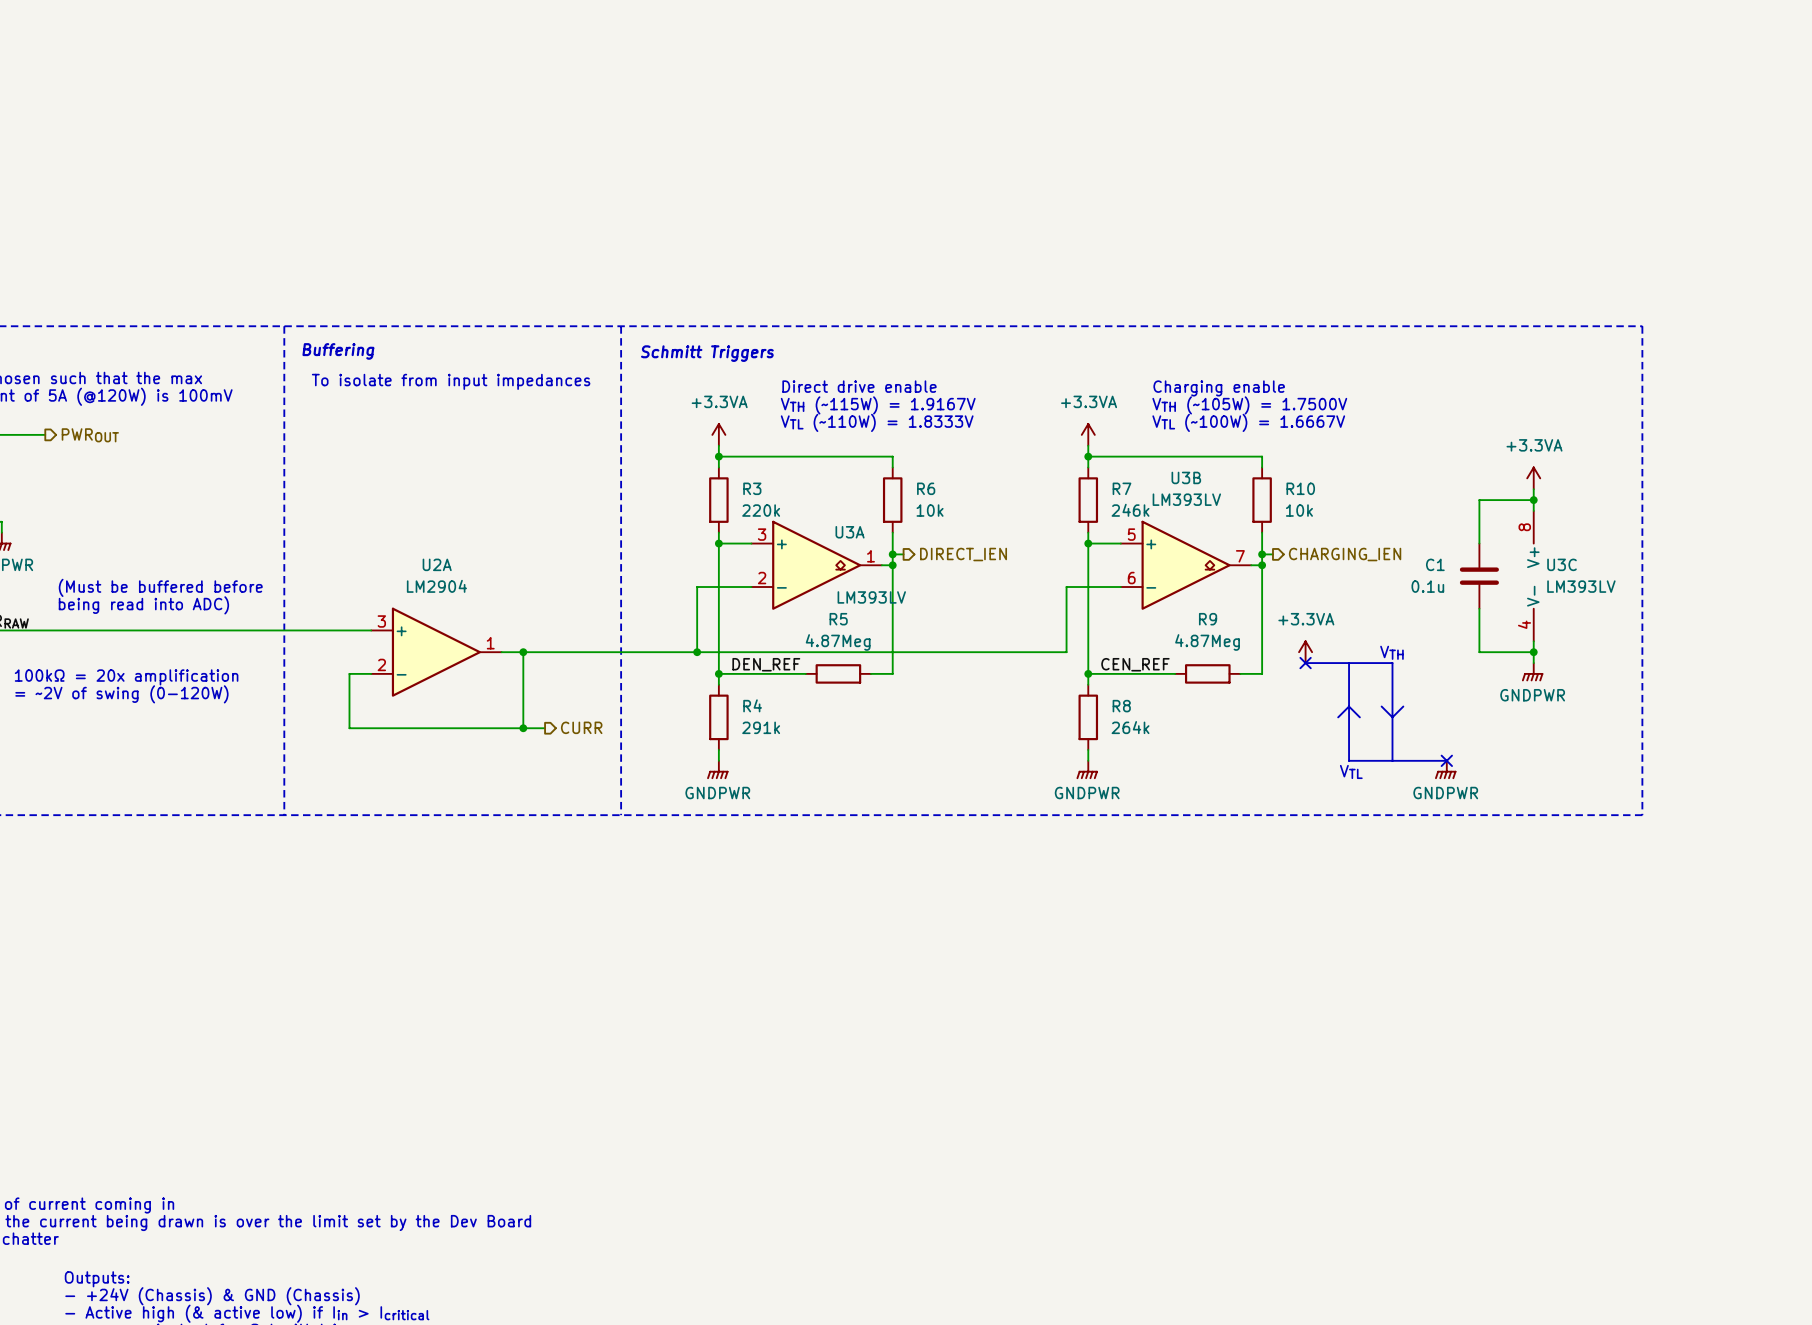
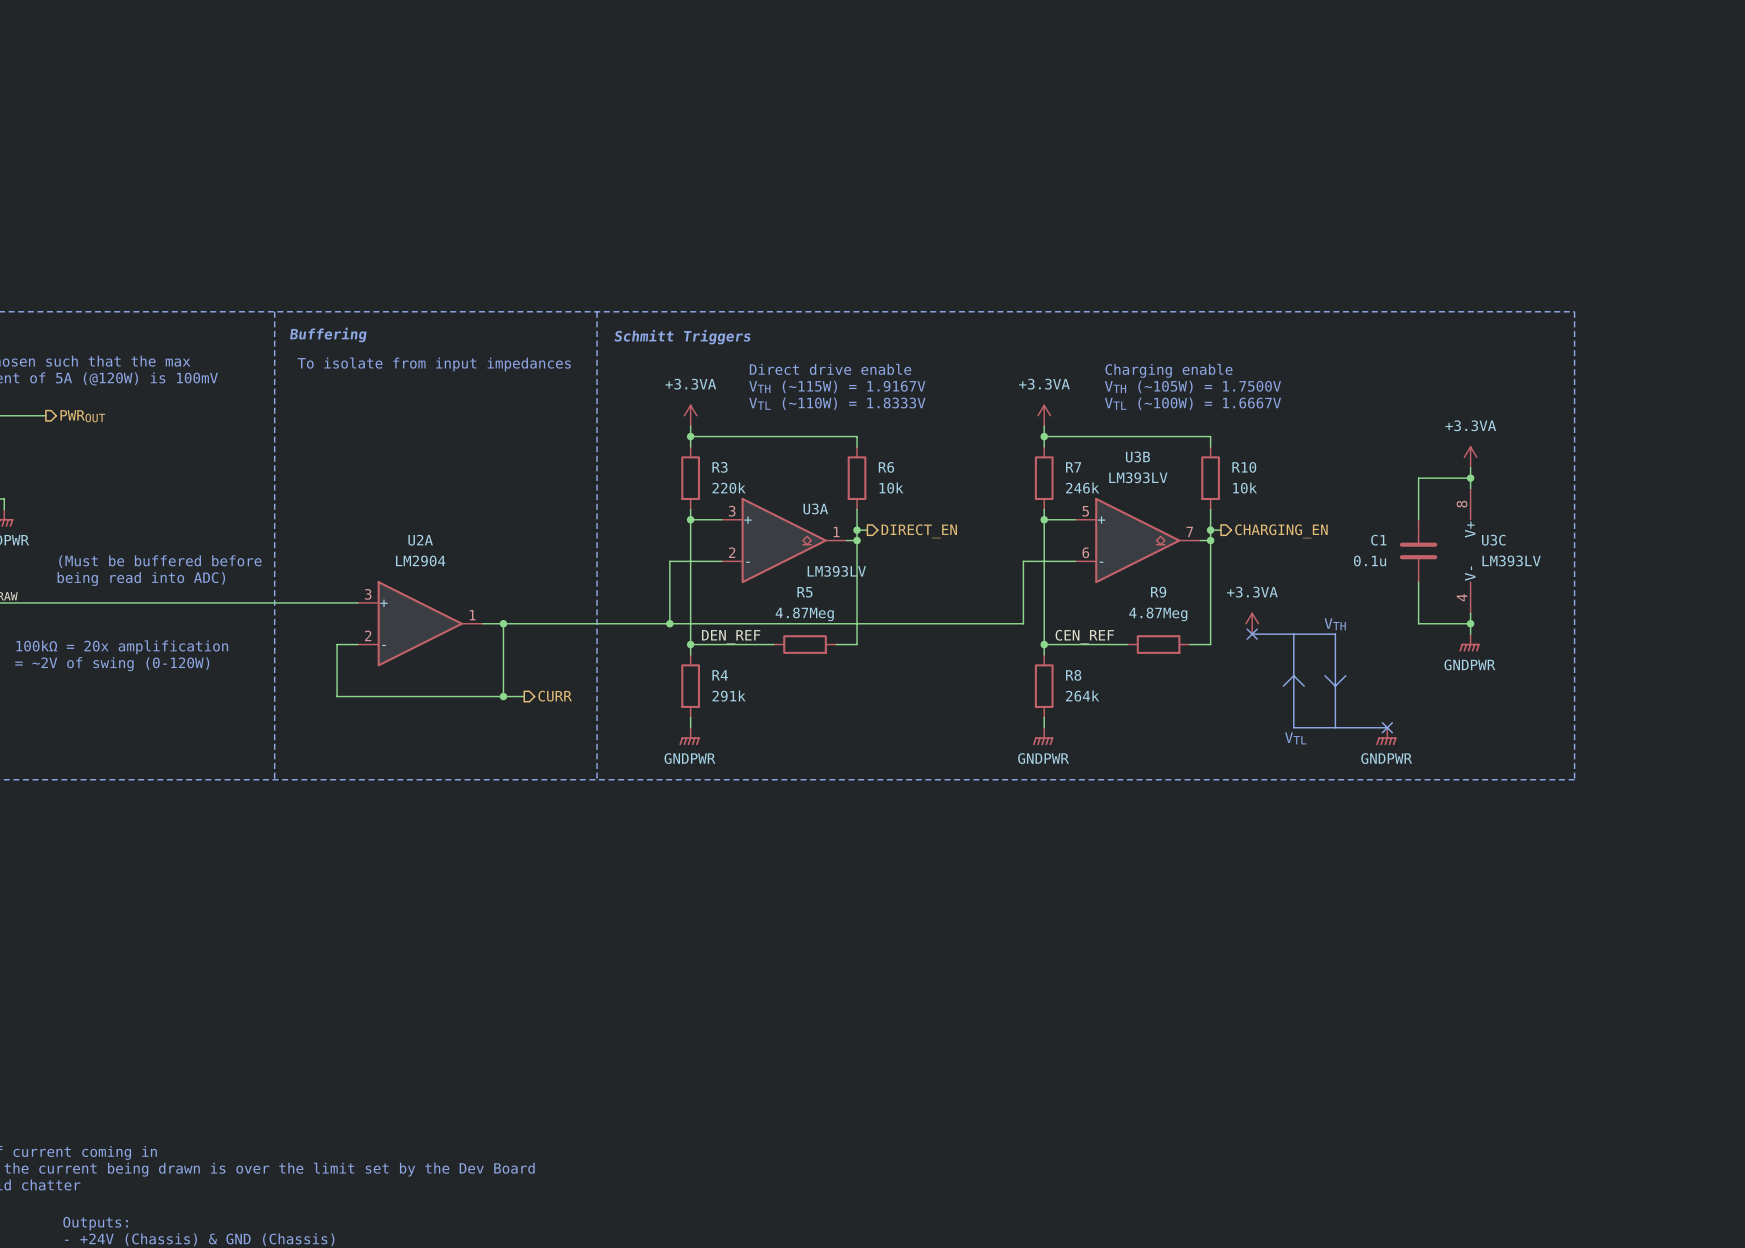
hierarchical label: DIRECT_IEN (963, 554) -> DIRECT_EN (919, 531)
hierarchical label: CHARGING_IEN (1345, 554) -> CHARGING_EN (1281, 531)

